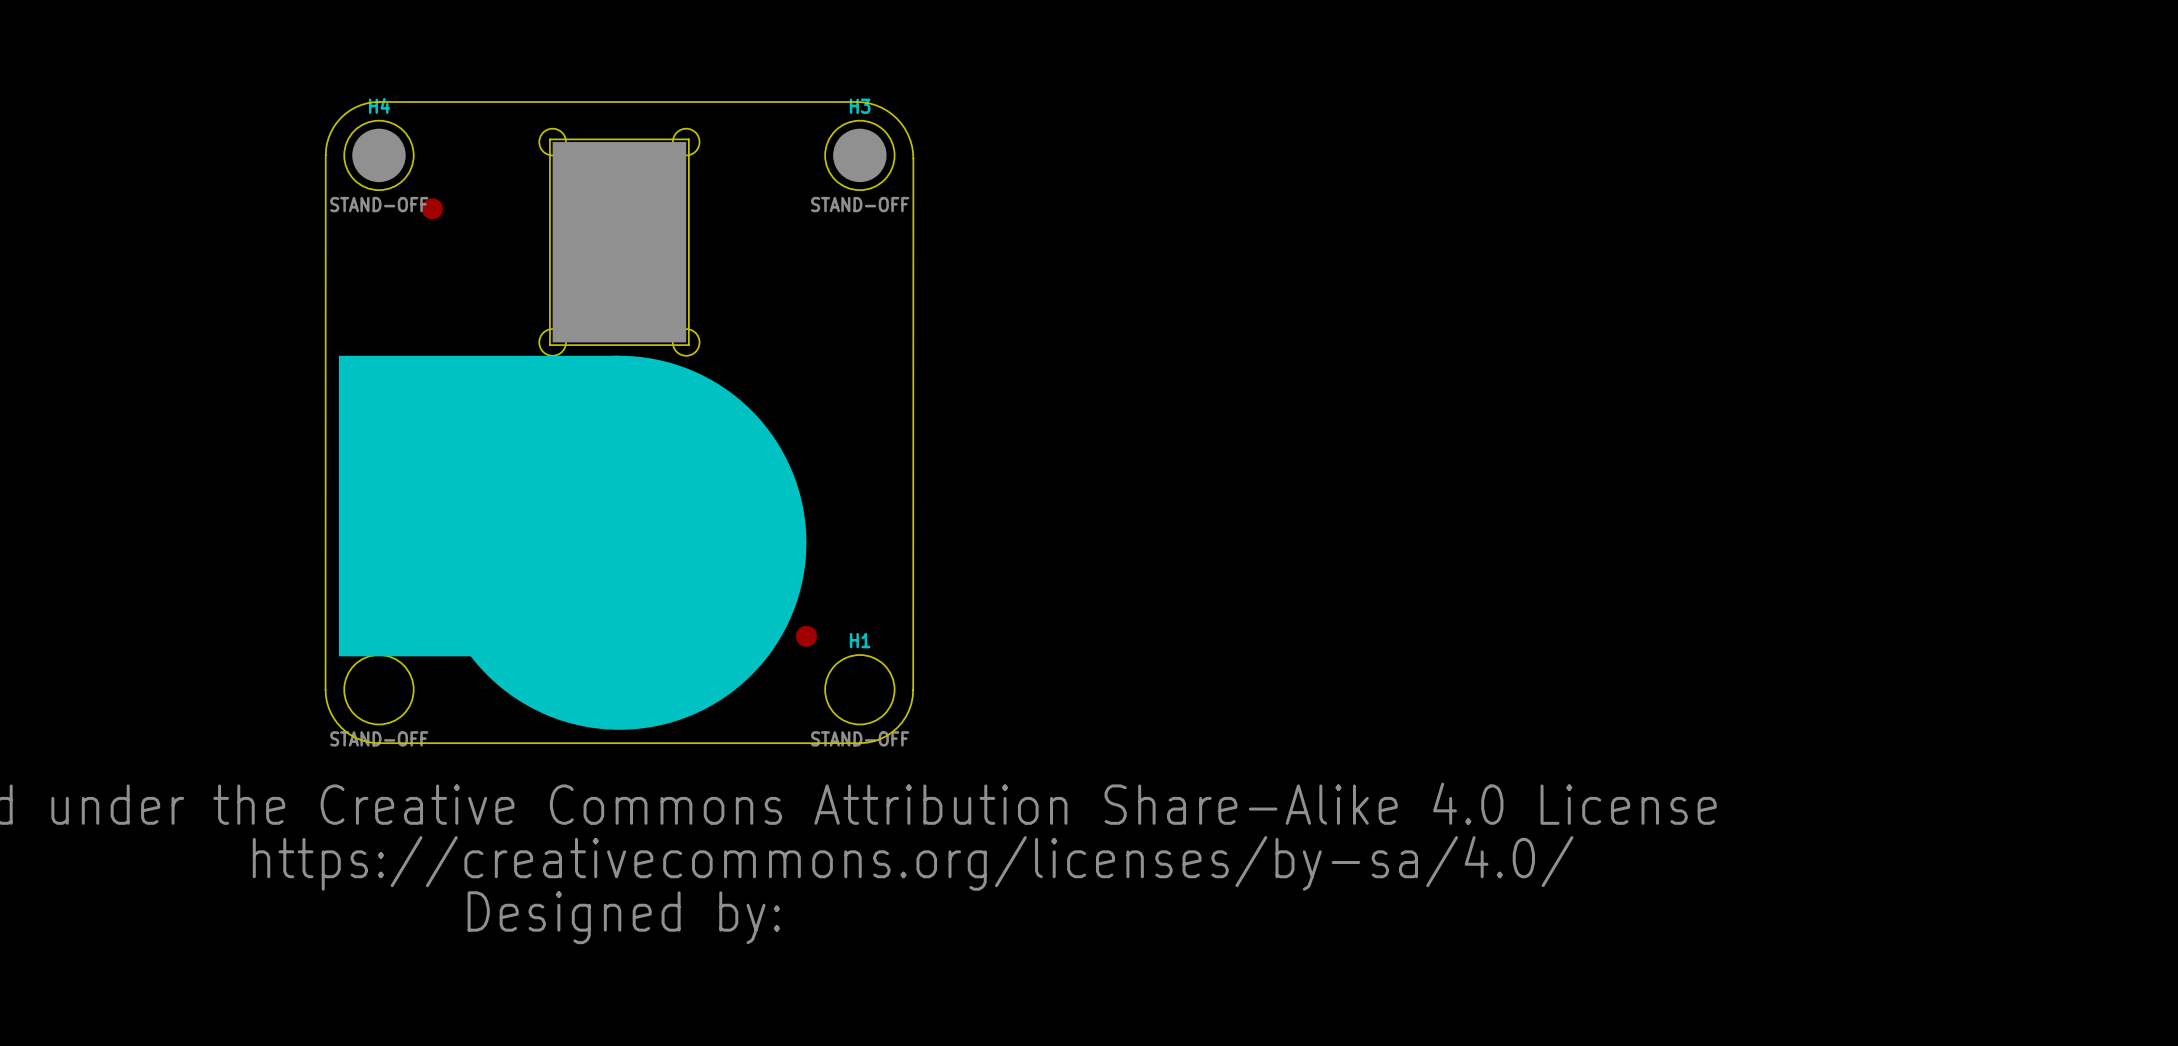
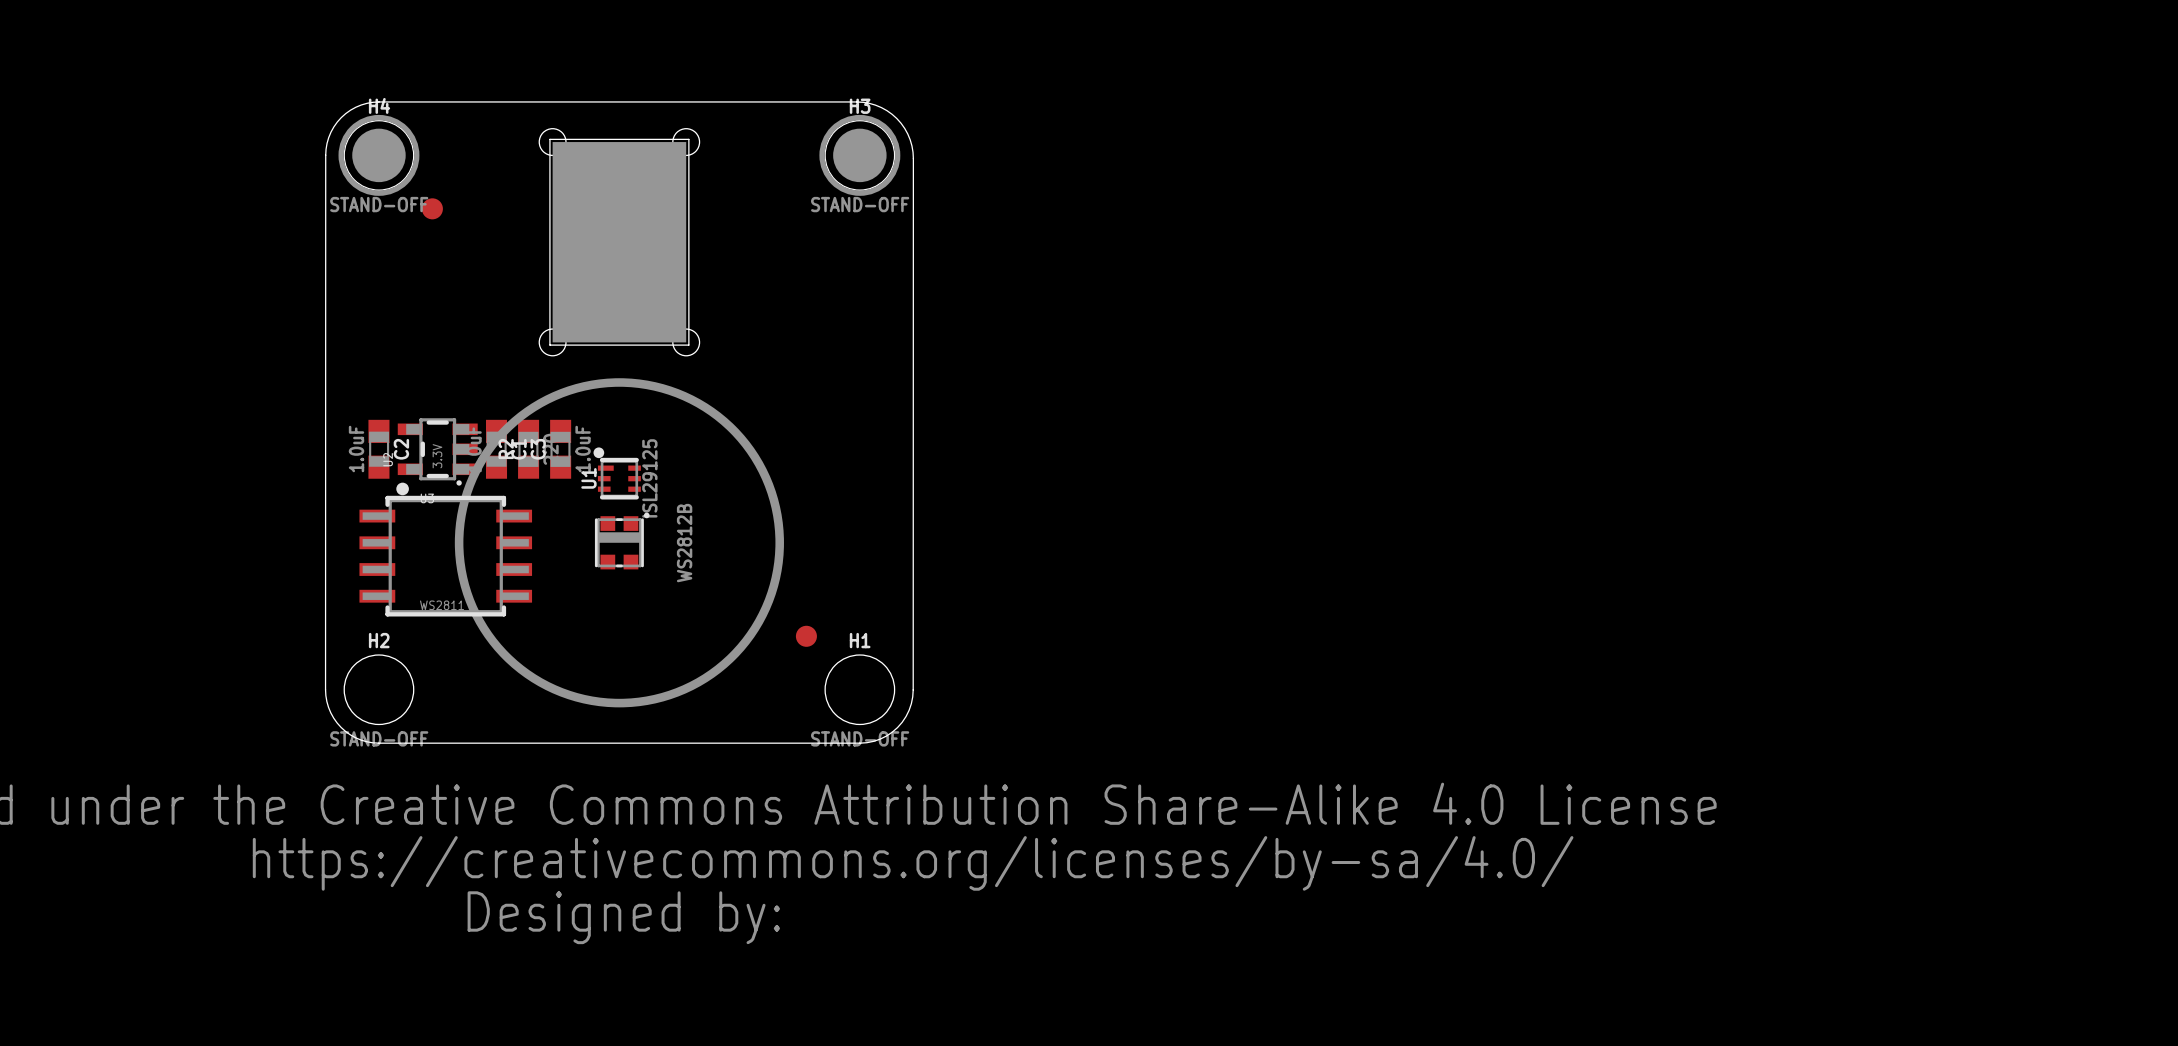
drawing: none -> [338, 114, 420, 196]
drawing: none -> [819, 114, 901, 196]
drawing: [338, 355, 807, 730] -> none

